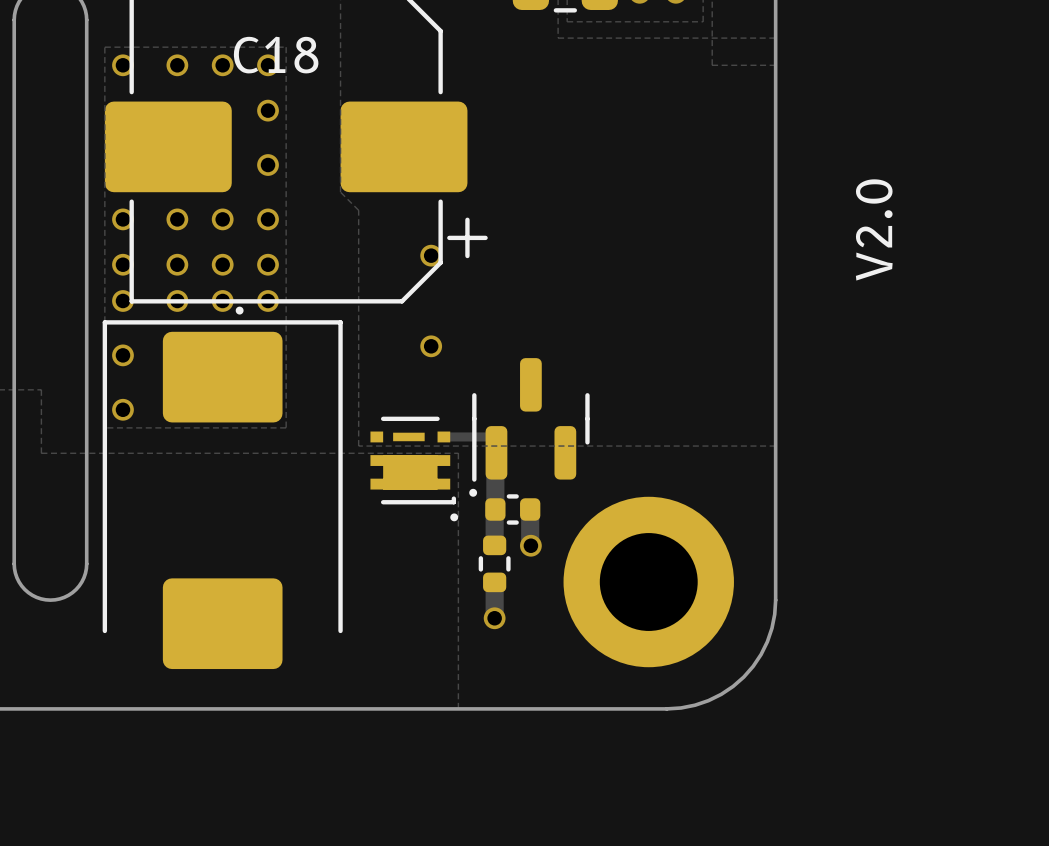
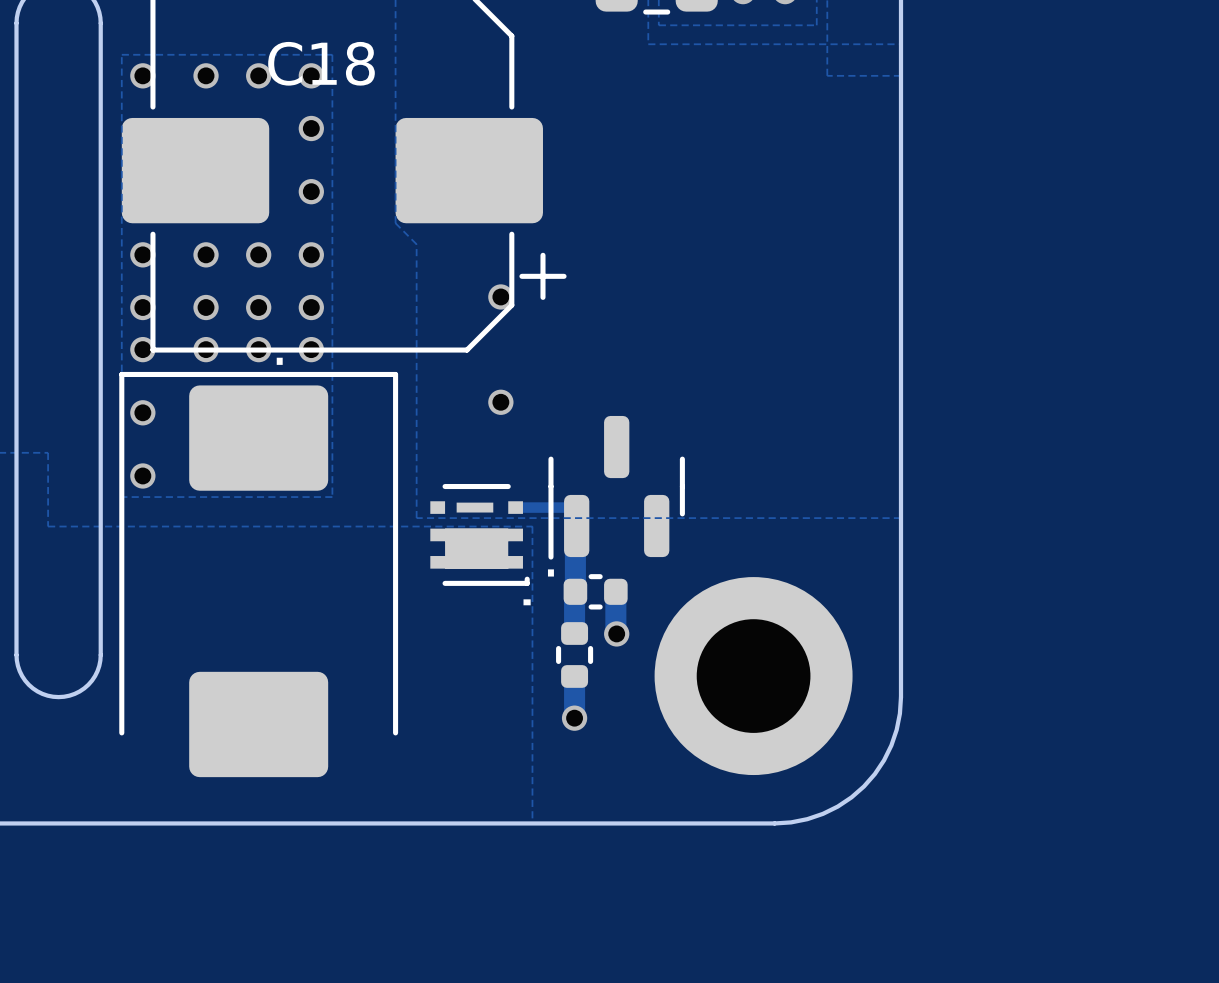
text: V2.0 (874, 229) -> none

